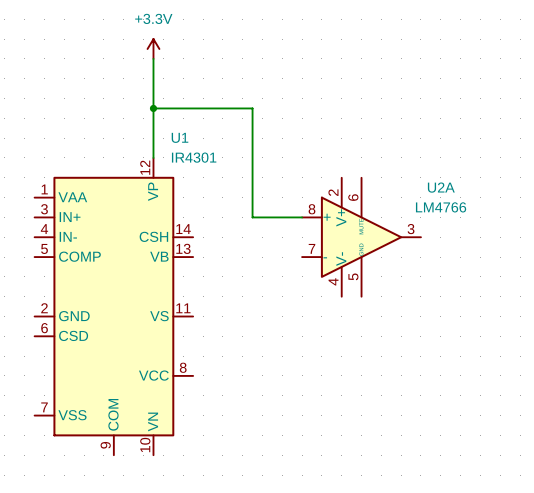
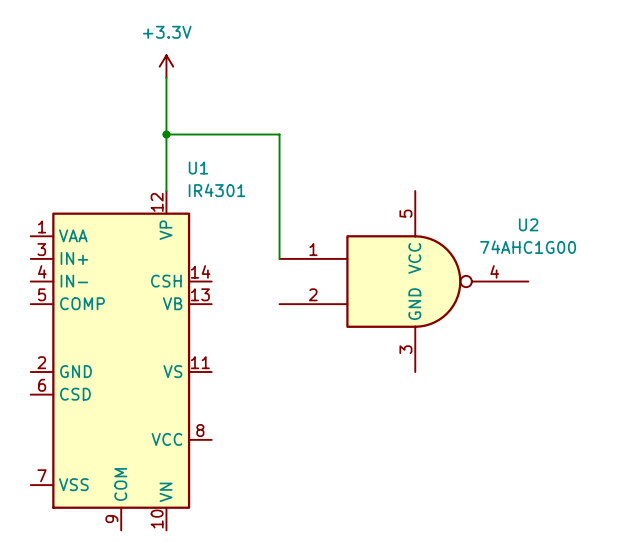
U2A: LM4766 (361, 237) -> none
U2: none -> 74AHC1G00 (403, 281)

